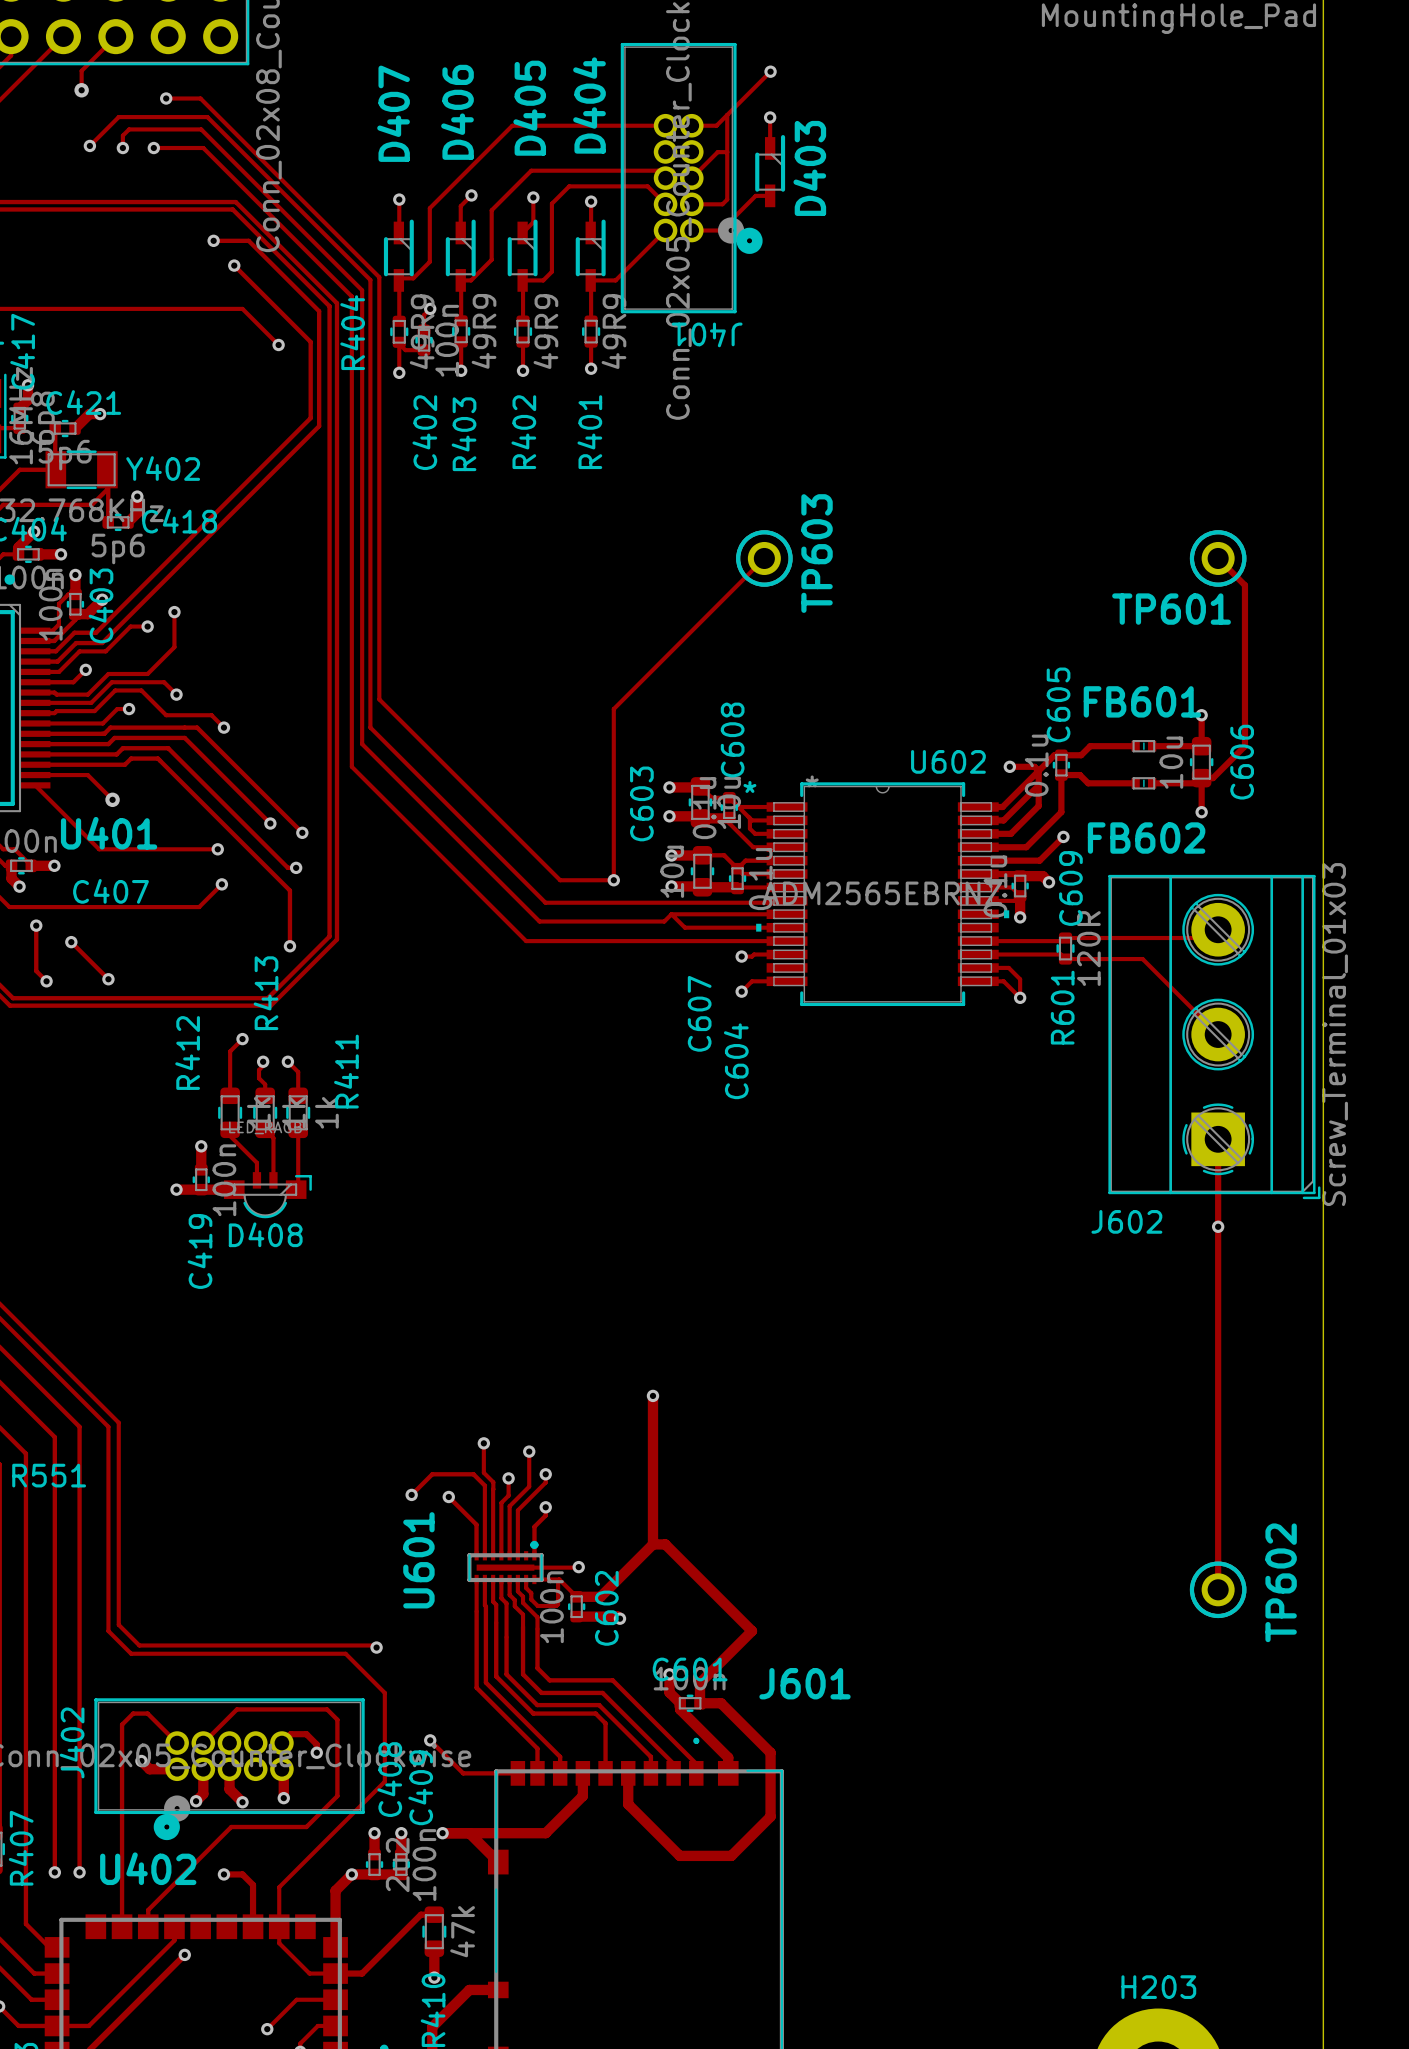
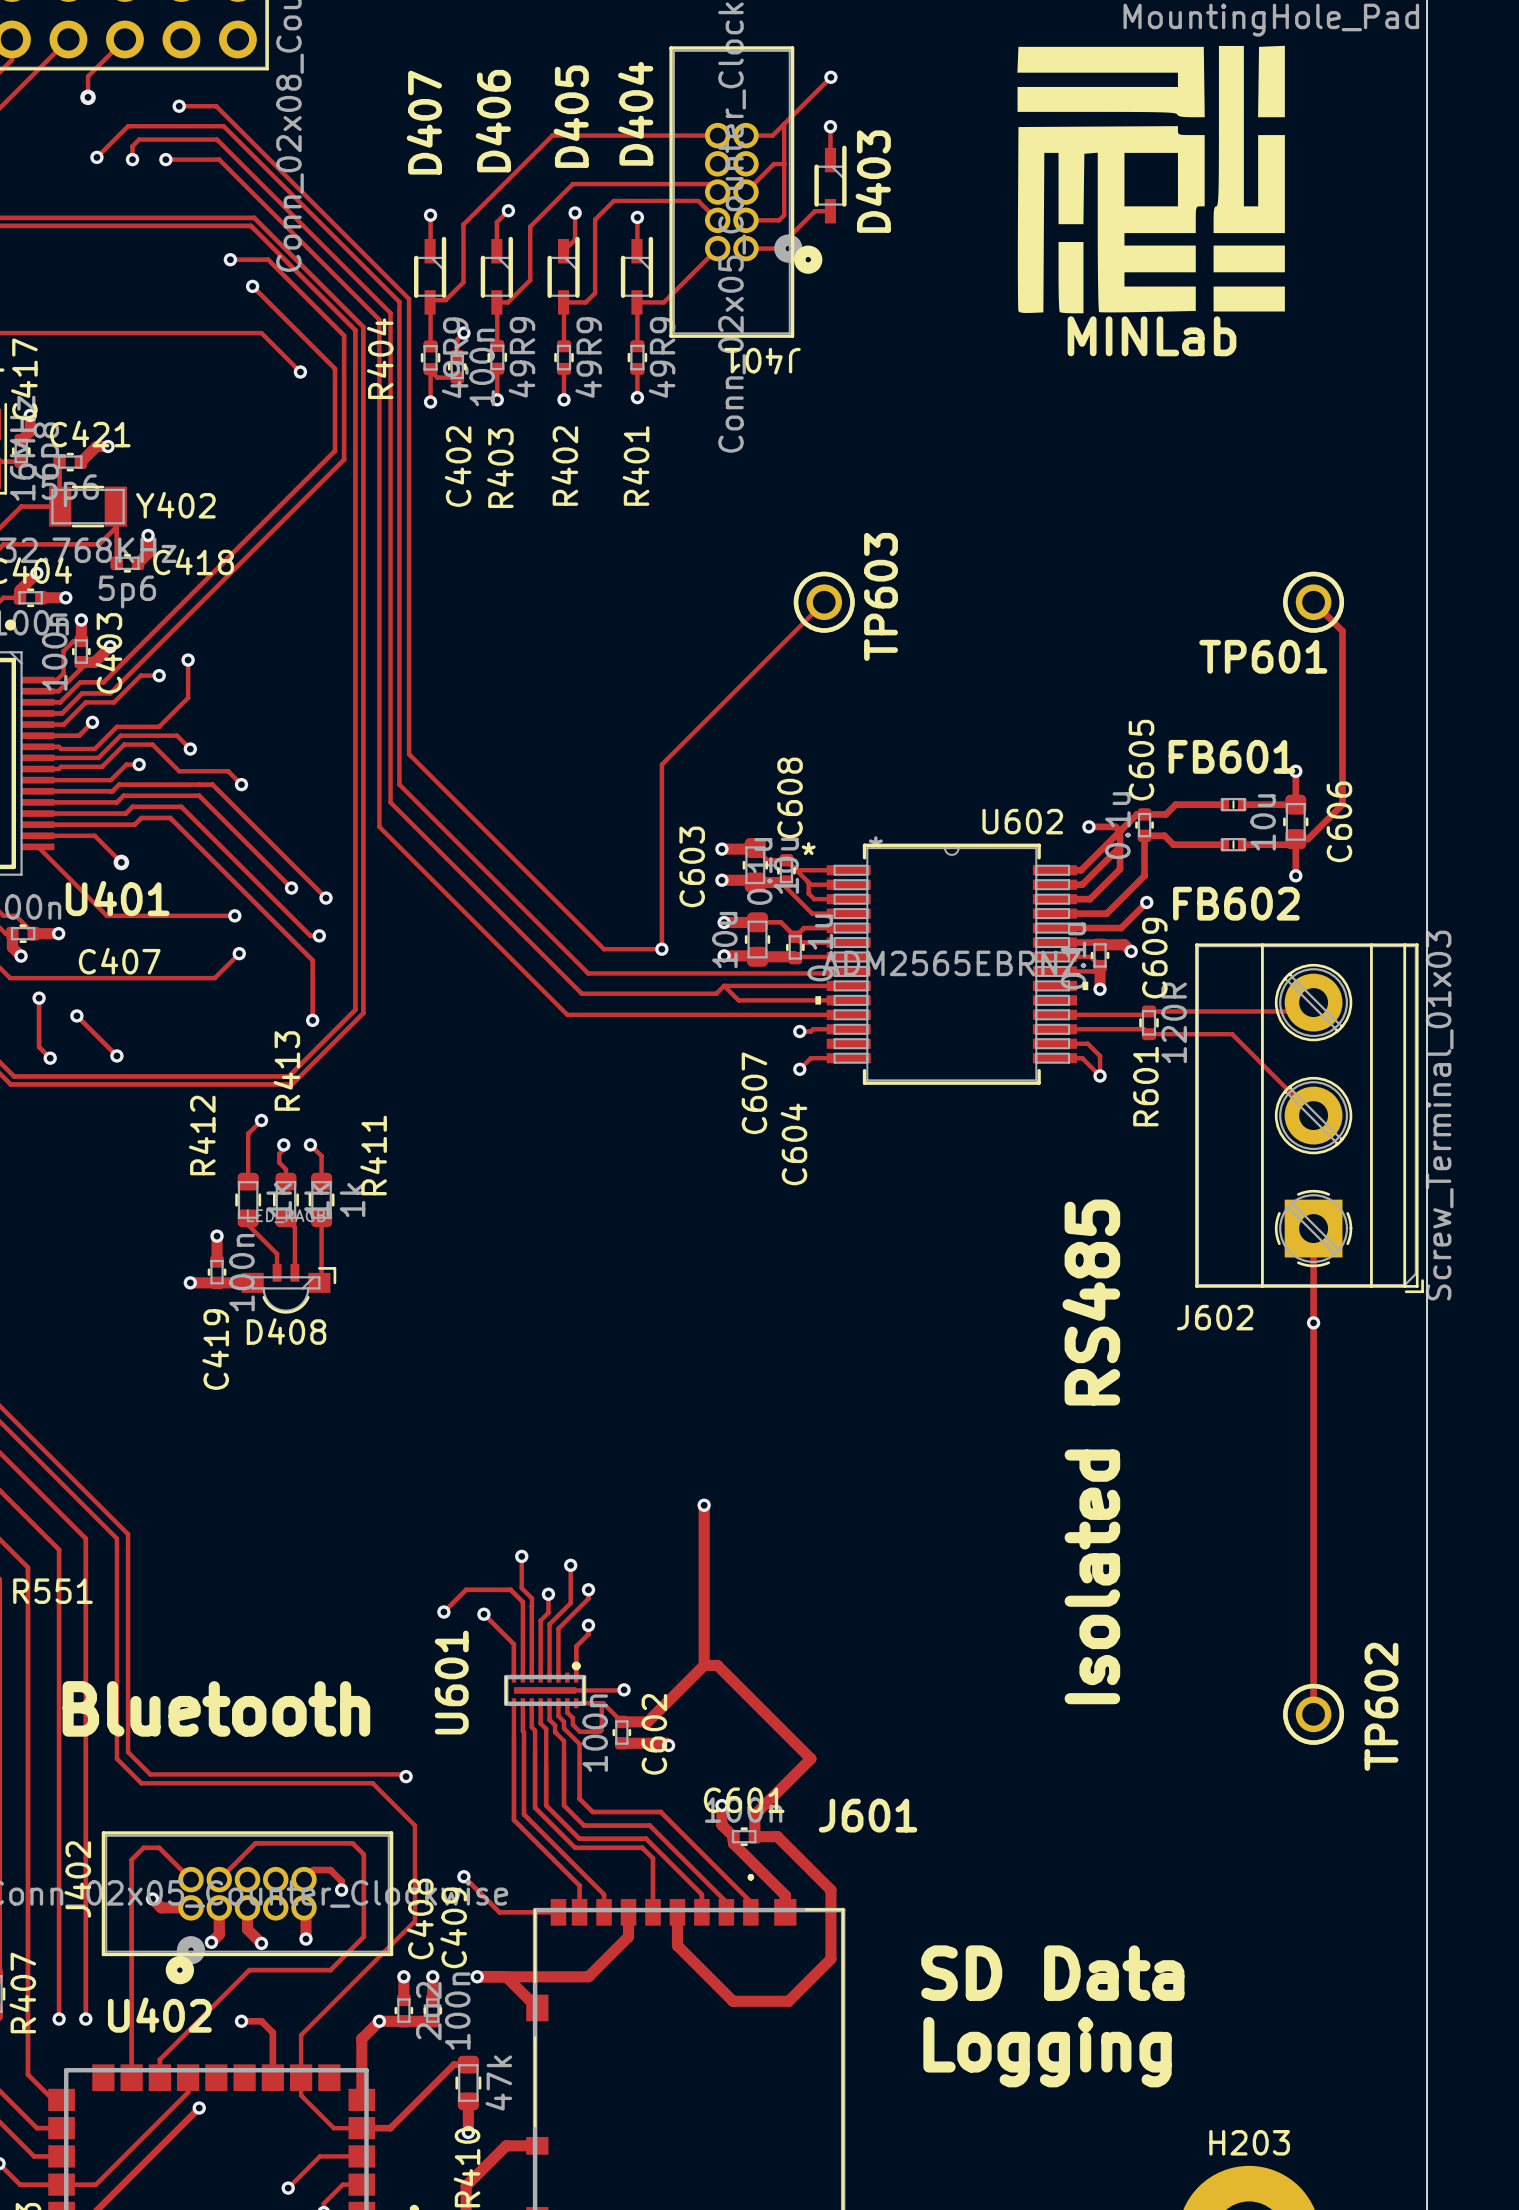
drawing: none -> [1017, 45, 1285, 314]
text: none -> Isolated RS485 (1091, 1451)
text: none -> Bluetooth (216, 1708)
text: none -> SD Data (1052, 1973)
text: none -> Logging (1047, 2052)

